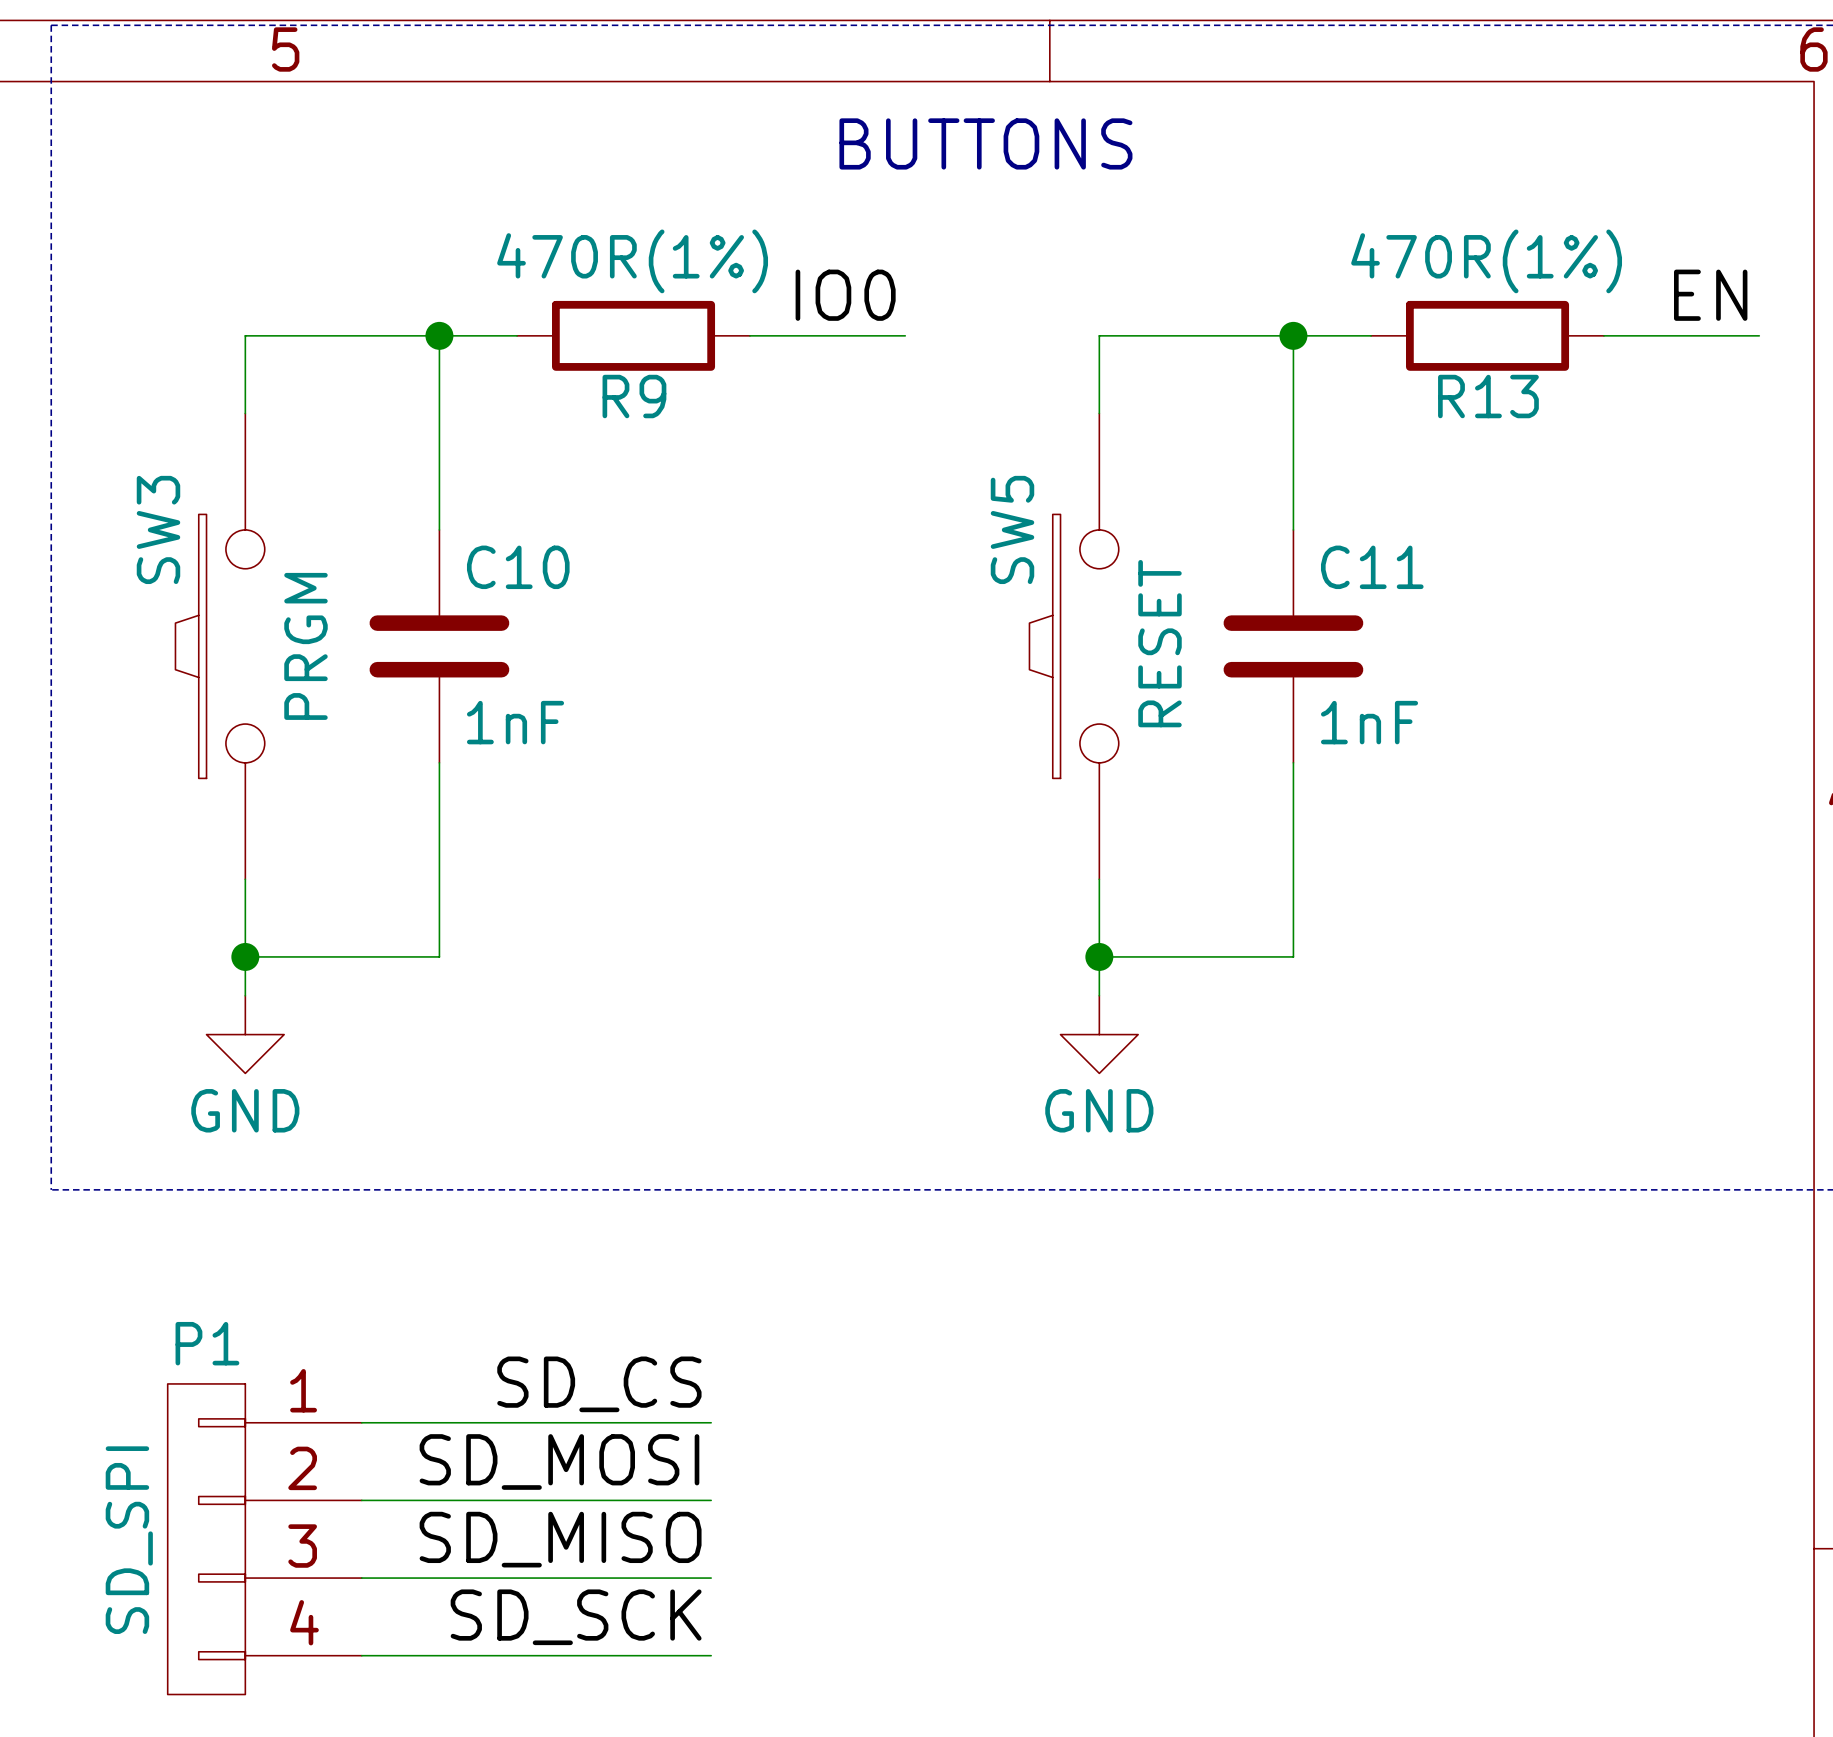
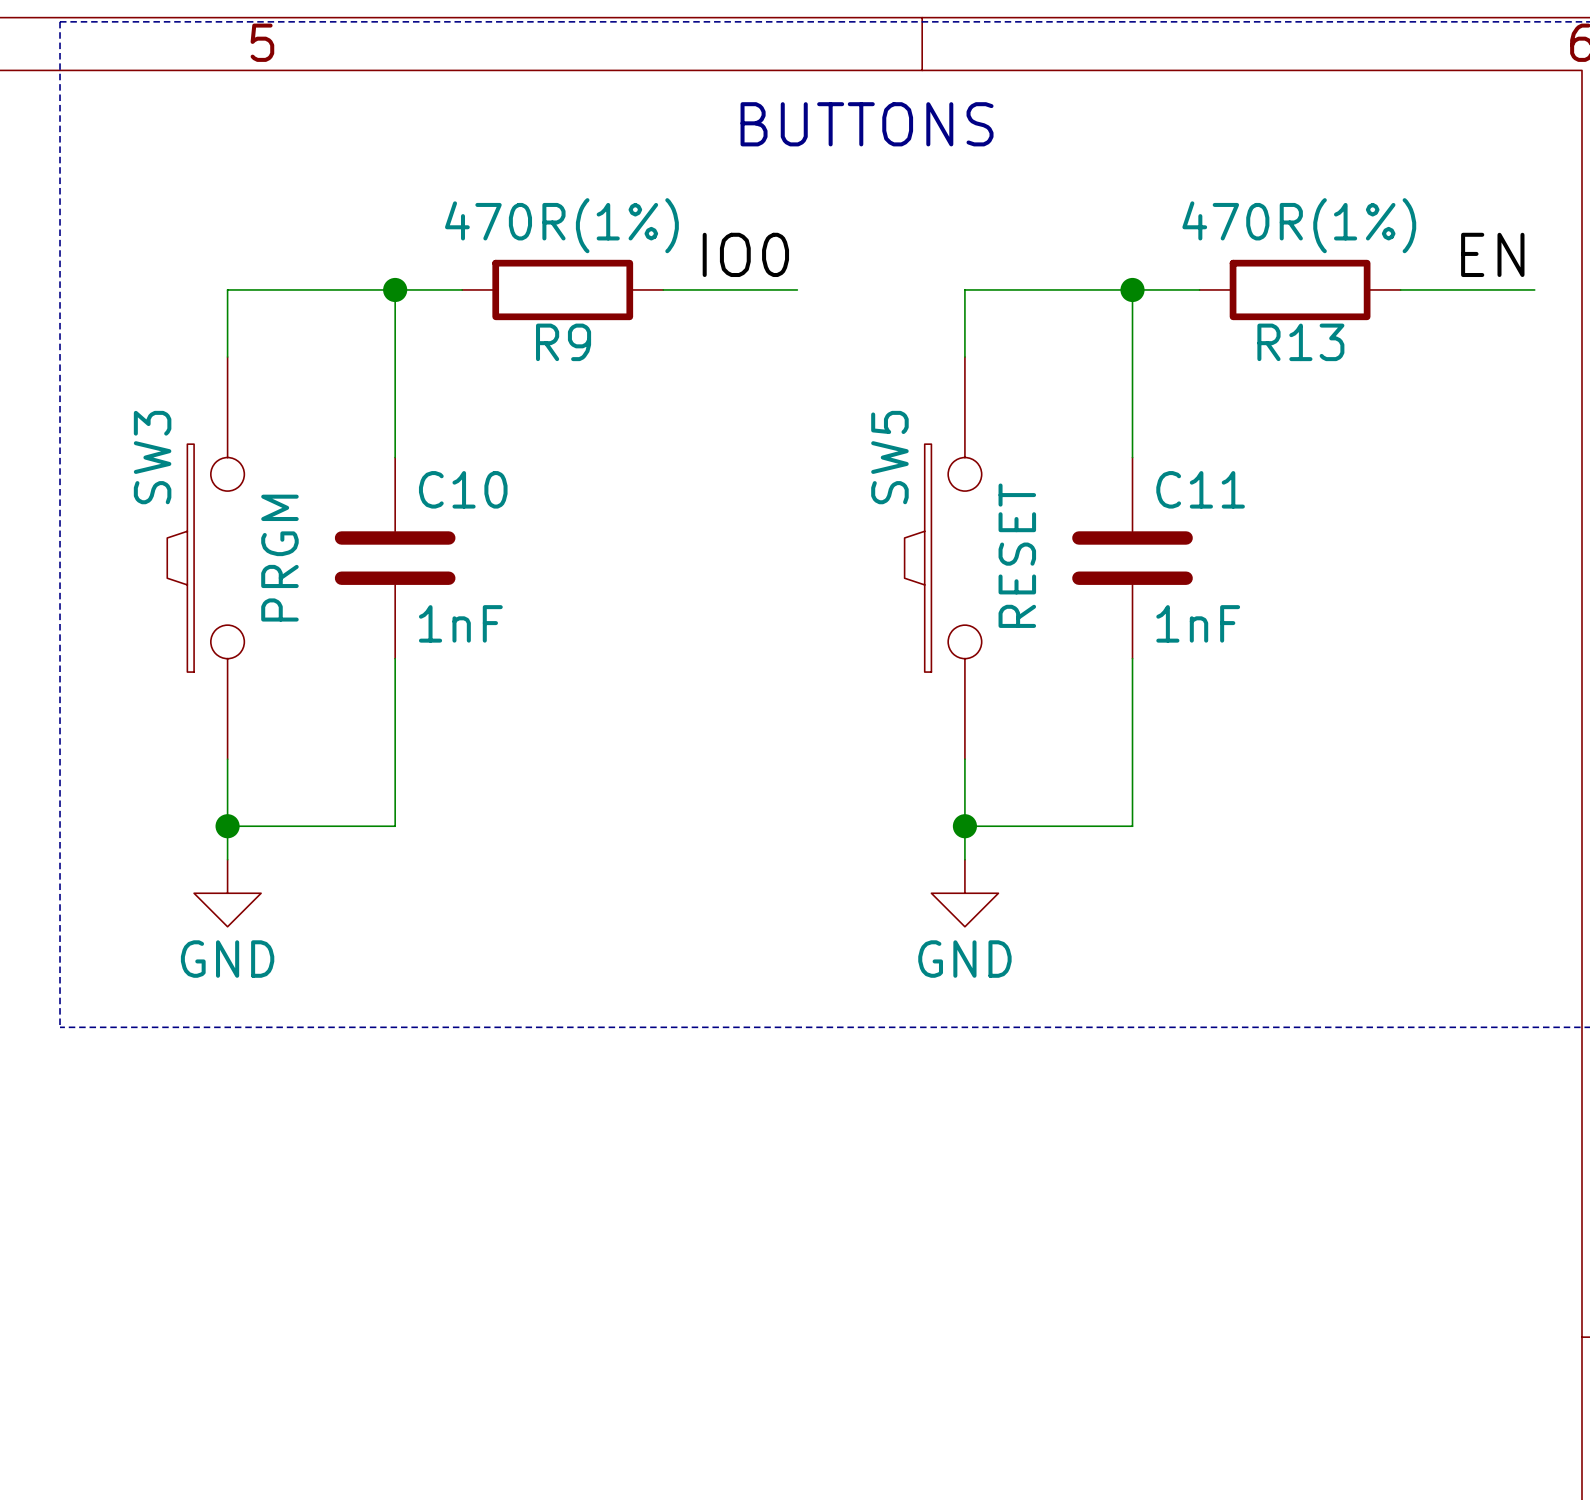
label: SD_CS (599, 1384) -> none
wire: (361, 1422) (711, 1422) -> none
label: SD_MOSI (559, 1461) -> none
wire: (361, 1500) (711, 1500) -> none
P1: SD_SPI (264, 1539) -> none
label: SD_MISO (560, 1539) -> none
wire: (361, 1578) (711, 1578) -> none
label: SD_SCK (576, 1617) -> none
wire: (361, 1655) (711, 1655) -> none

